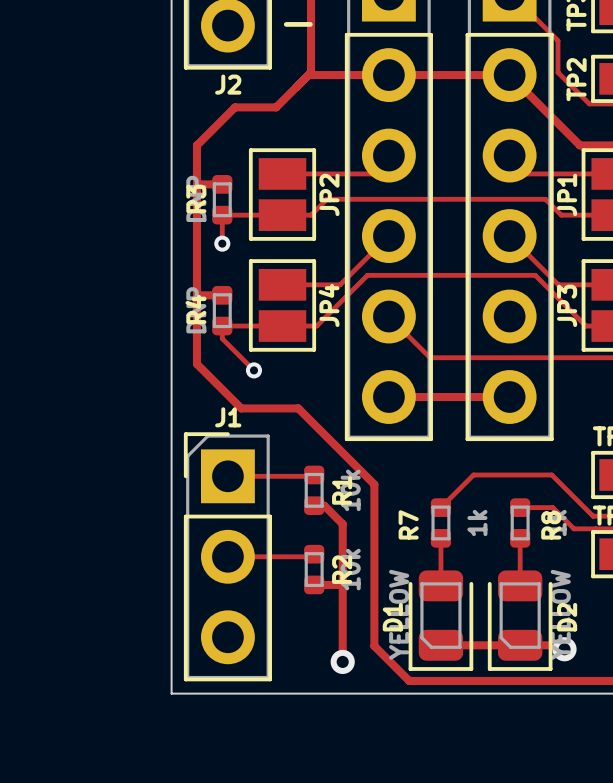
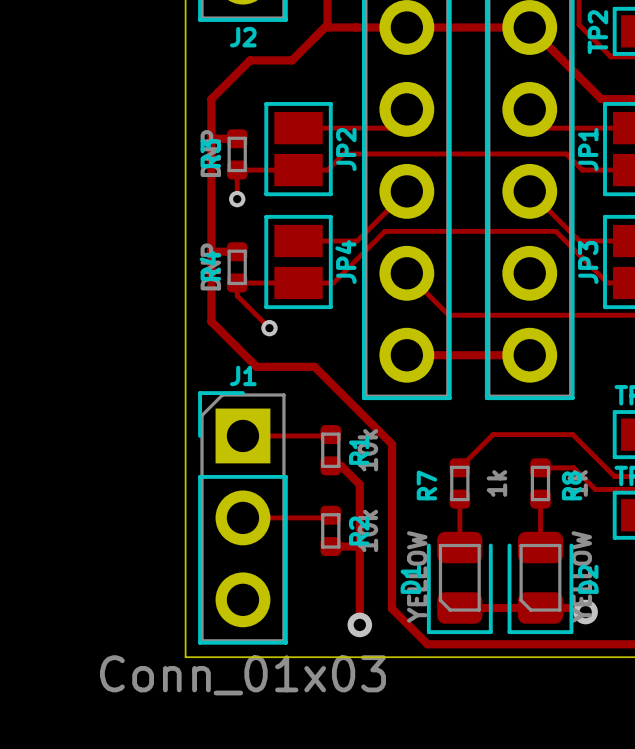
J1 value: none -> Conn_01x03 (242, 675)

